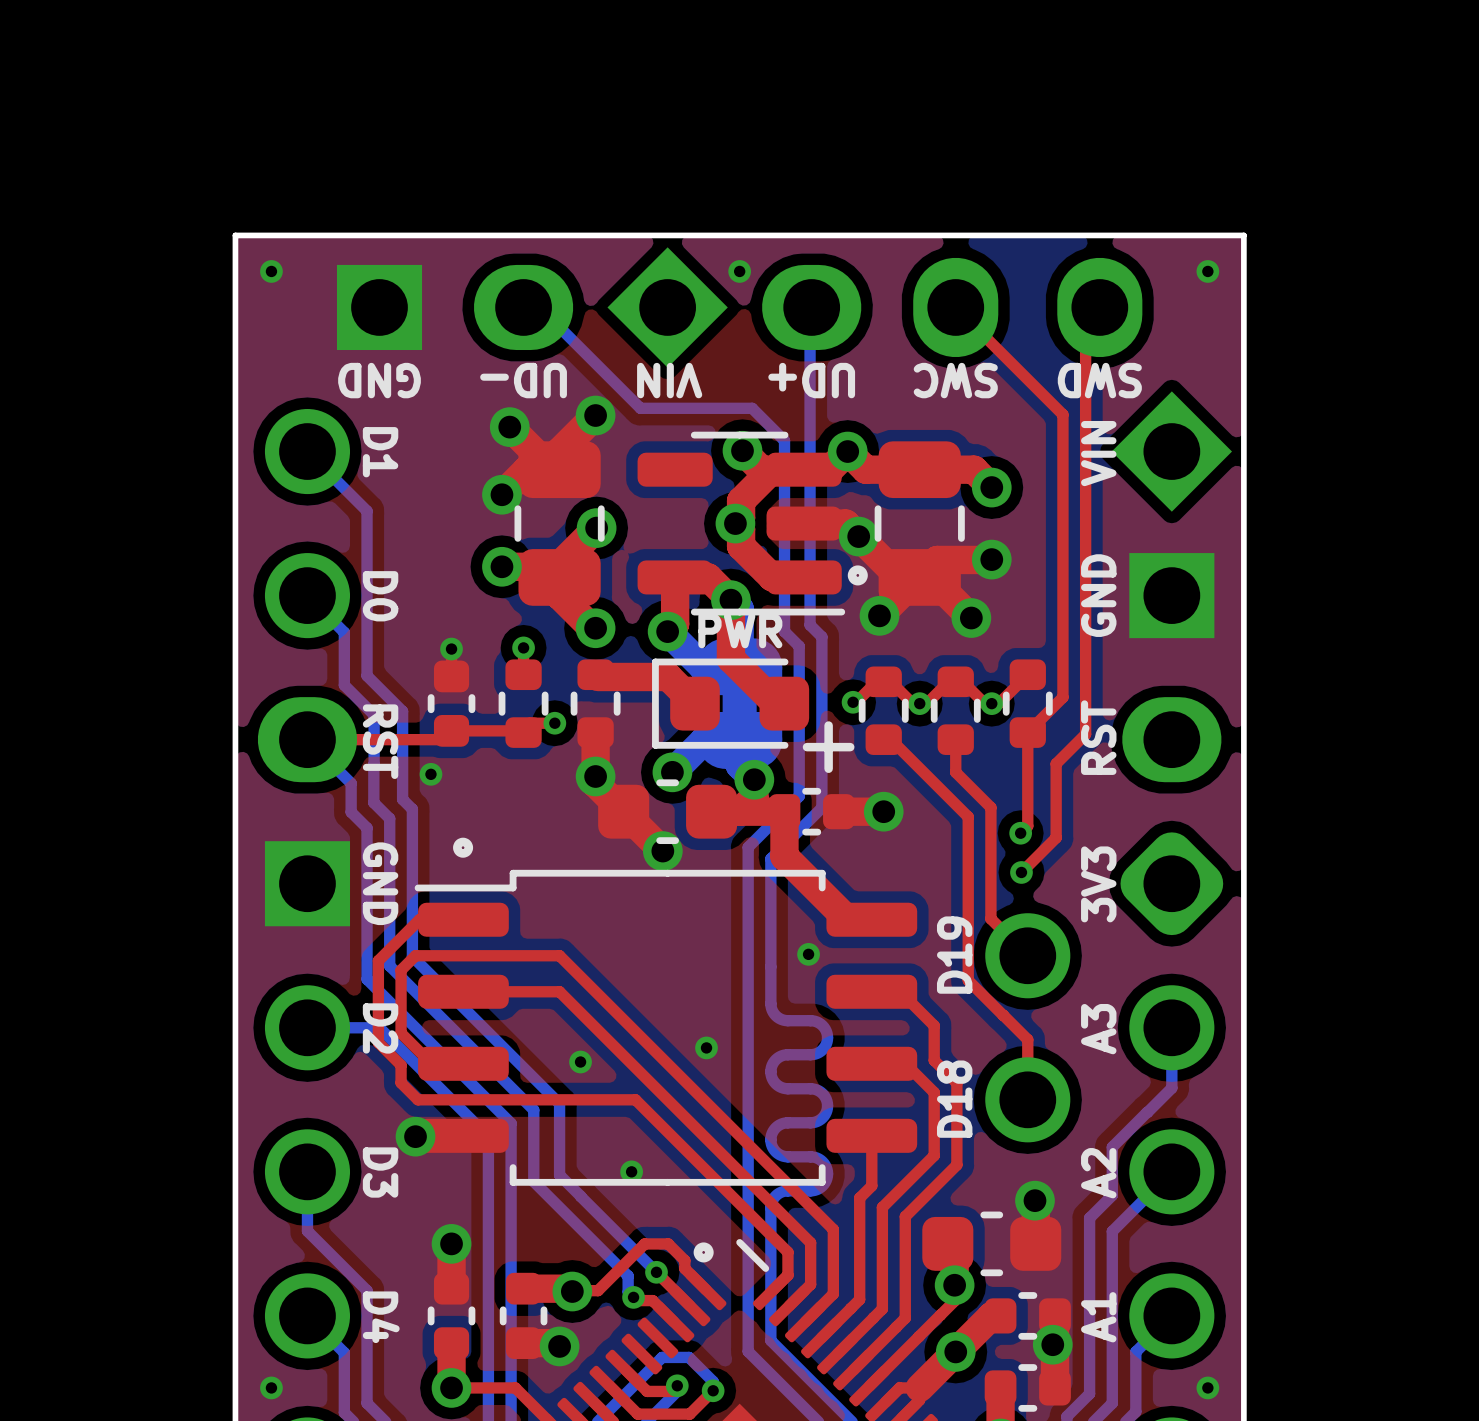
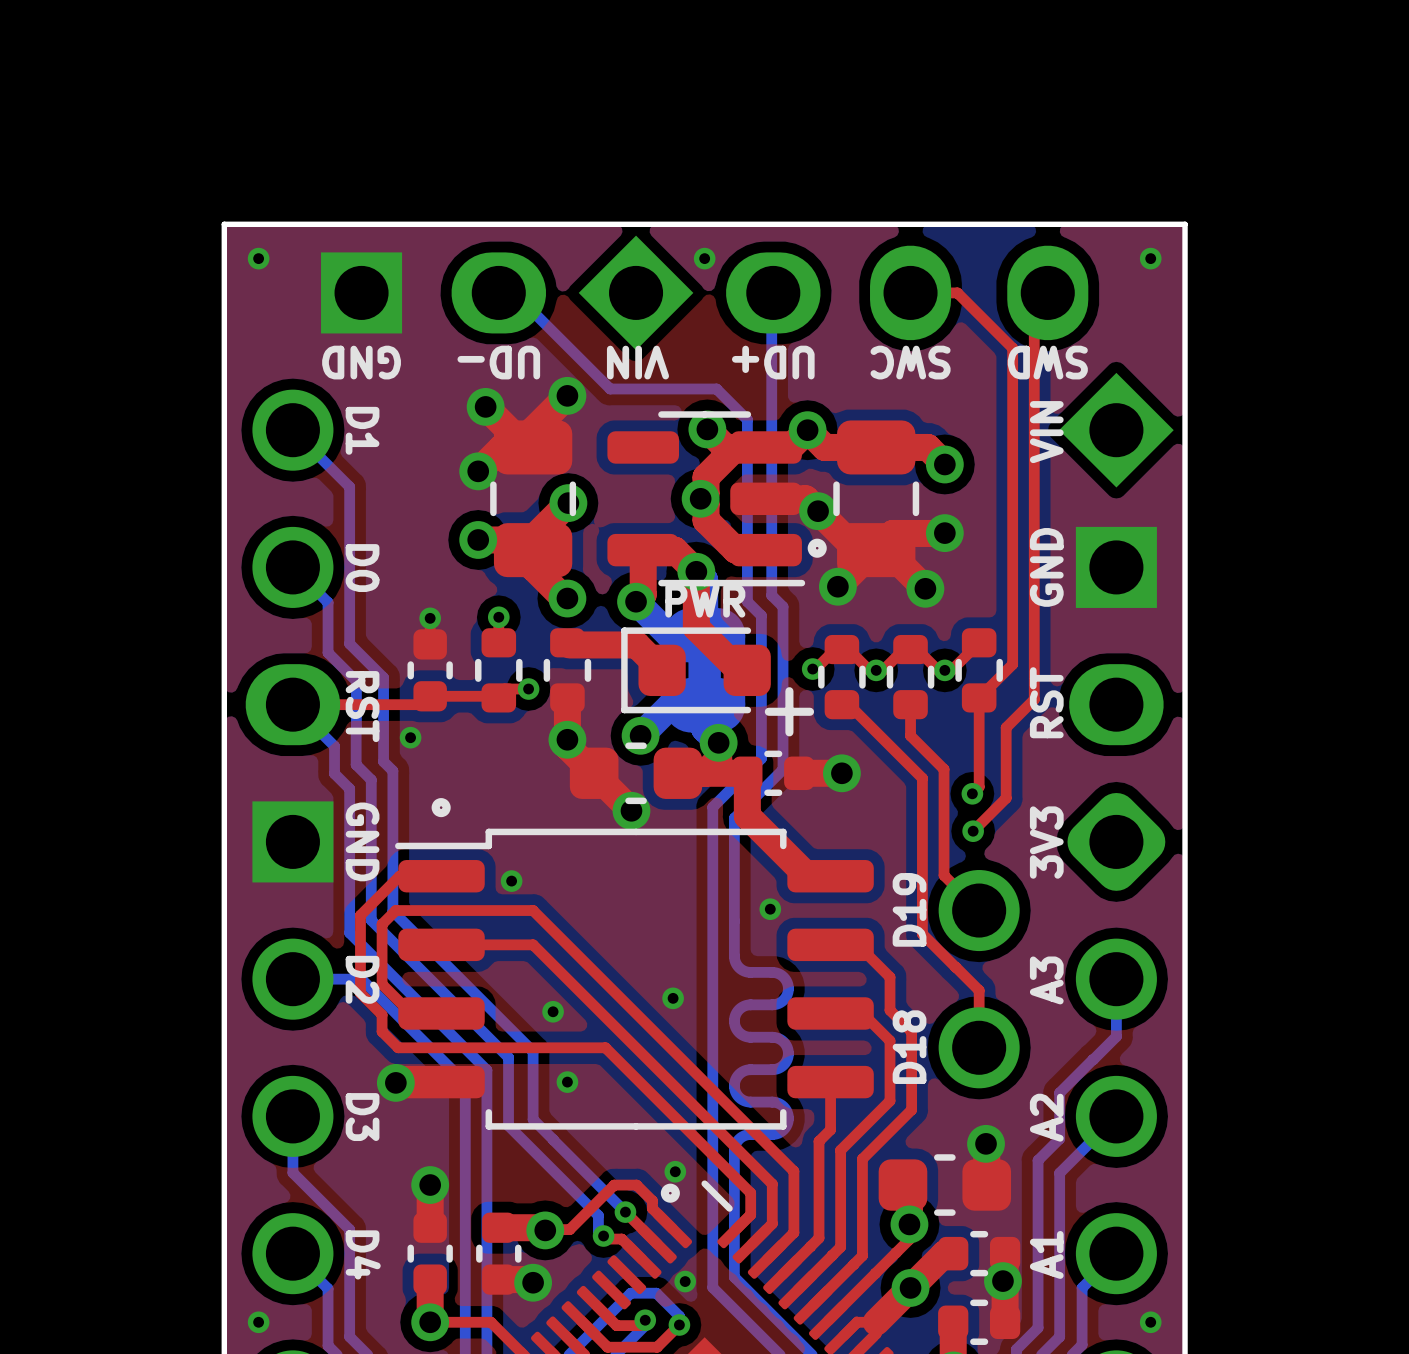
top track: (955, 307) (1062, 414) -> (910, 292) (957, 292) (1012, 348) (1012, 395)
via: none -> (511, 881)
via: none -> (567, 1082)
via: (631, 1171) -> none
via: none -> (675, 1171)
via: none -> (685, 1281)

